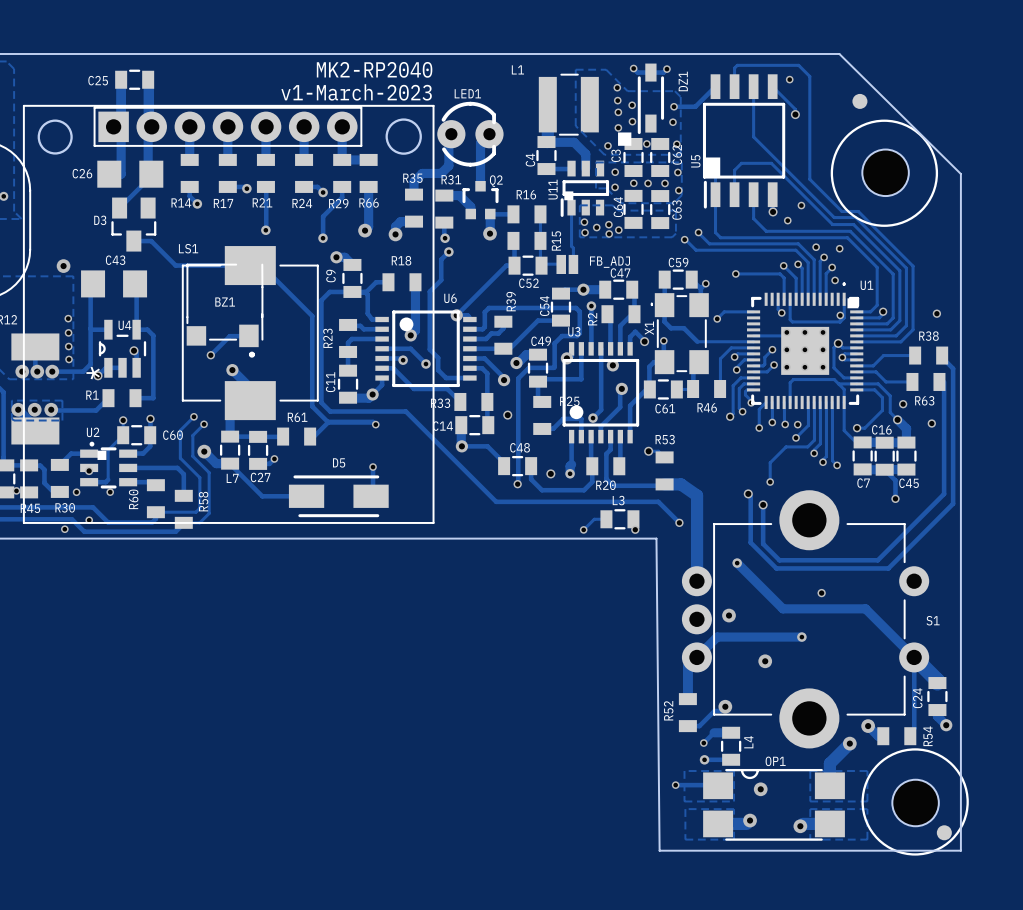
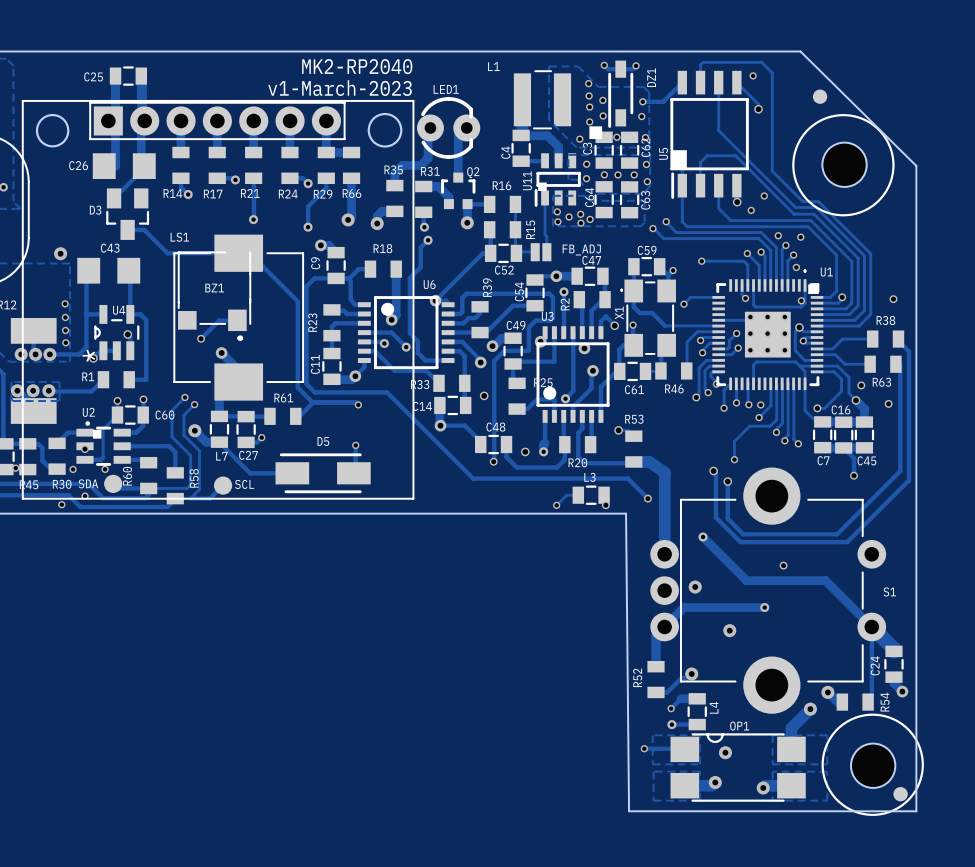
track: none -> (113, 483) (119, 488) (148, 488)
SDA: none -> (113, 483)
track: none -> (223, 485) (210, 498) (190, 498)
SCL: none -> (223, 485)

